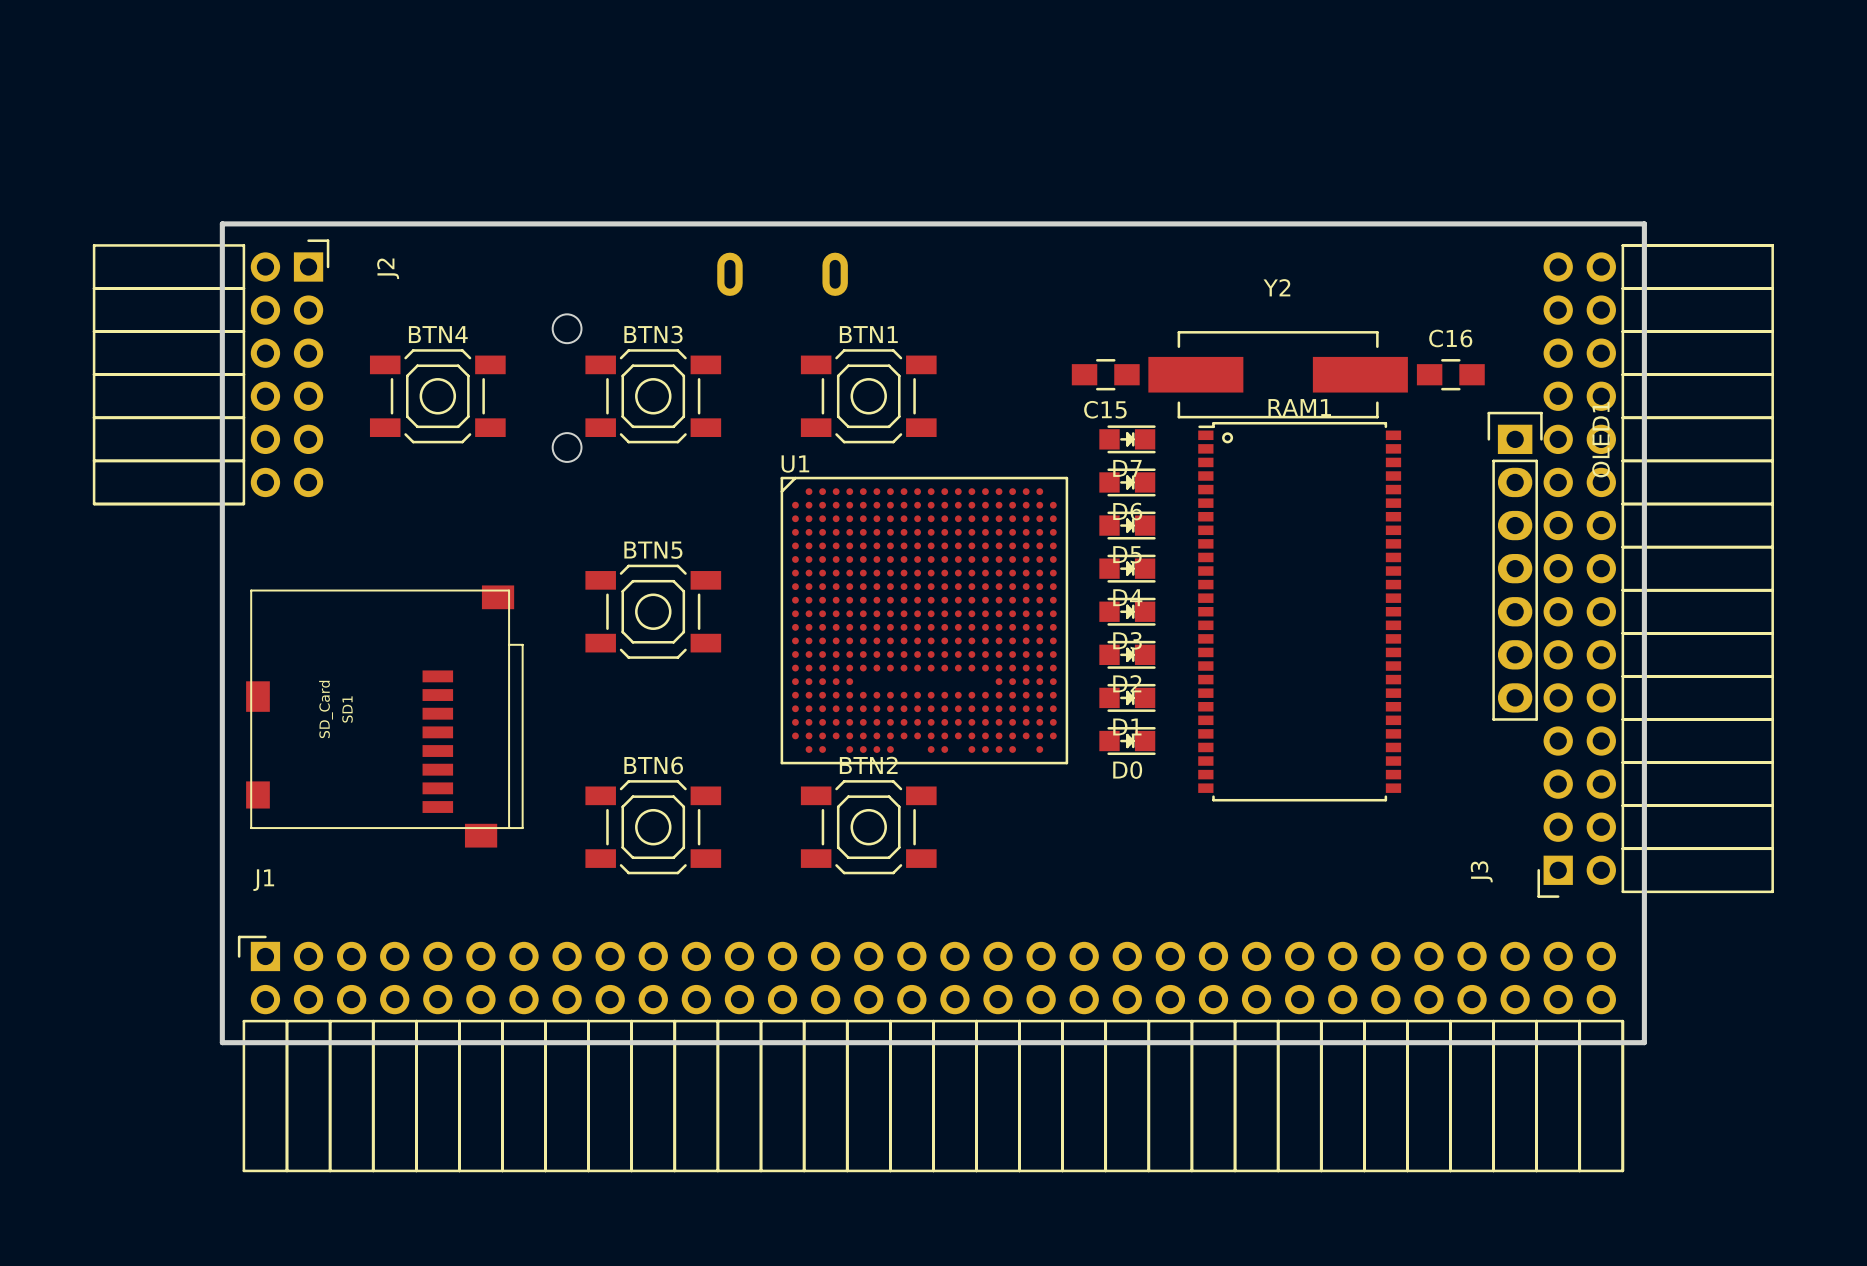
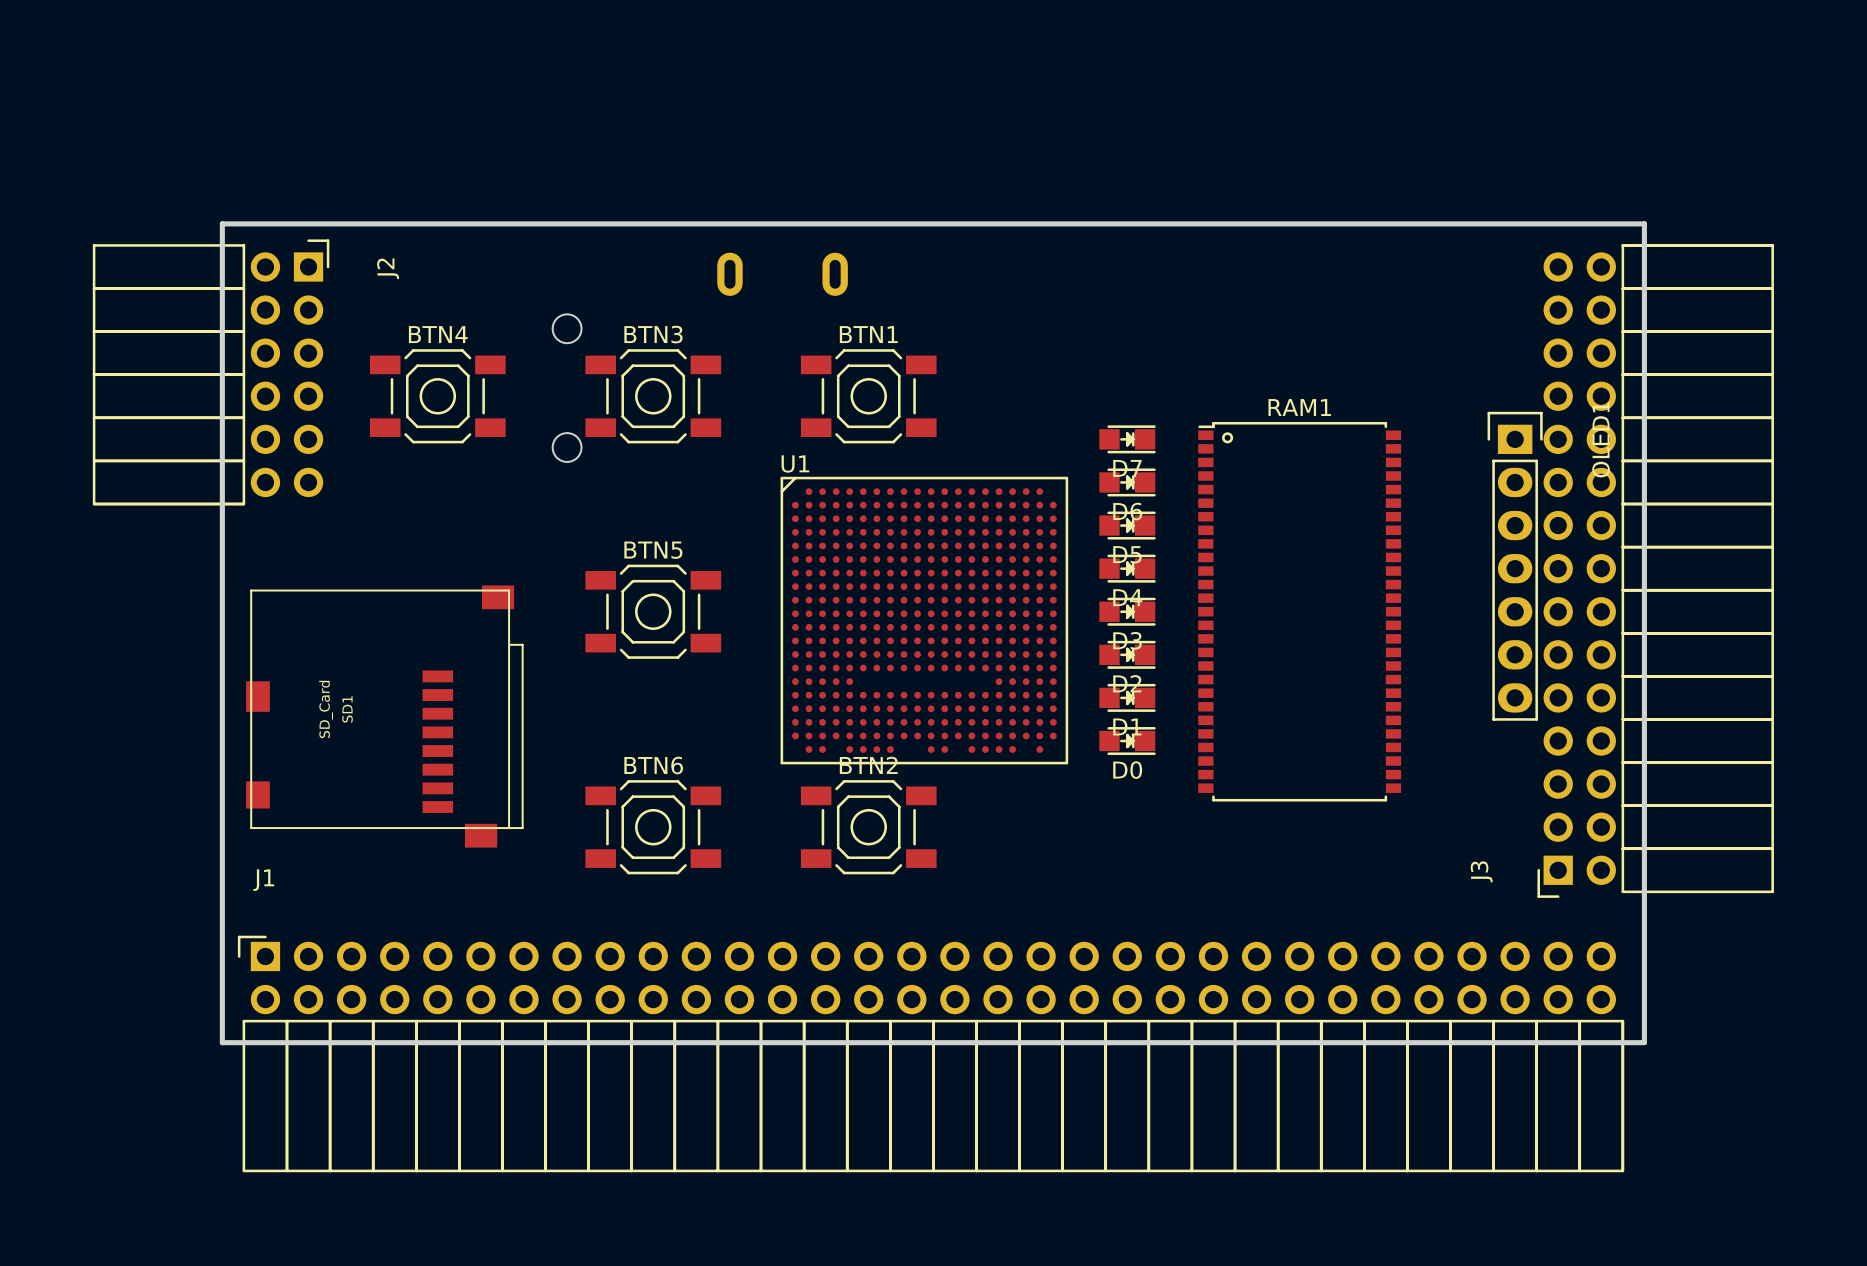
C15: (1105, 374) -> none
Y2: (1278, 374) -> none
C16: (1450, 374) -> none

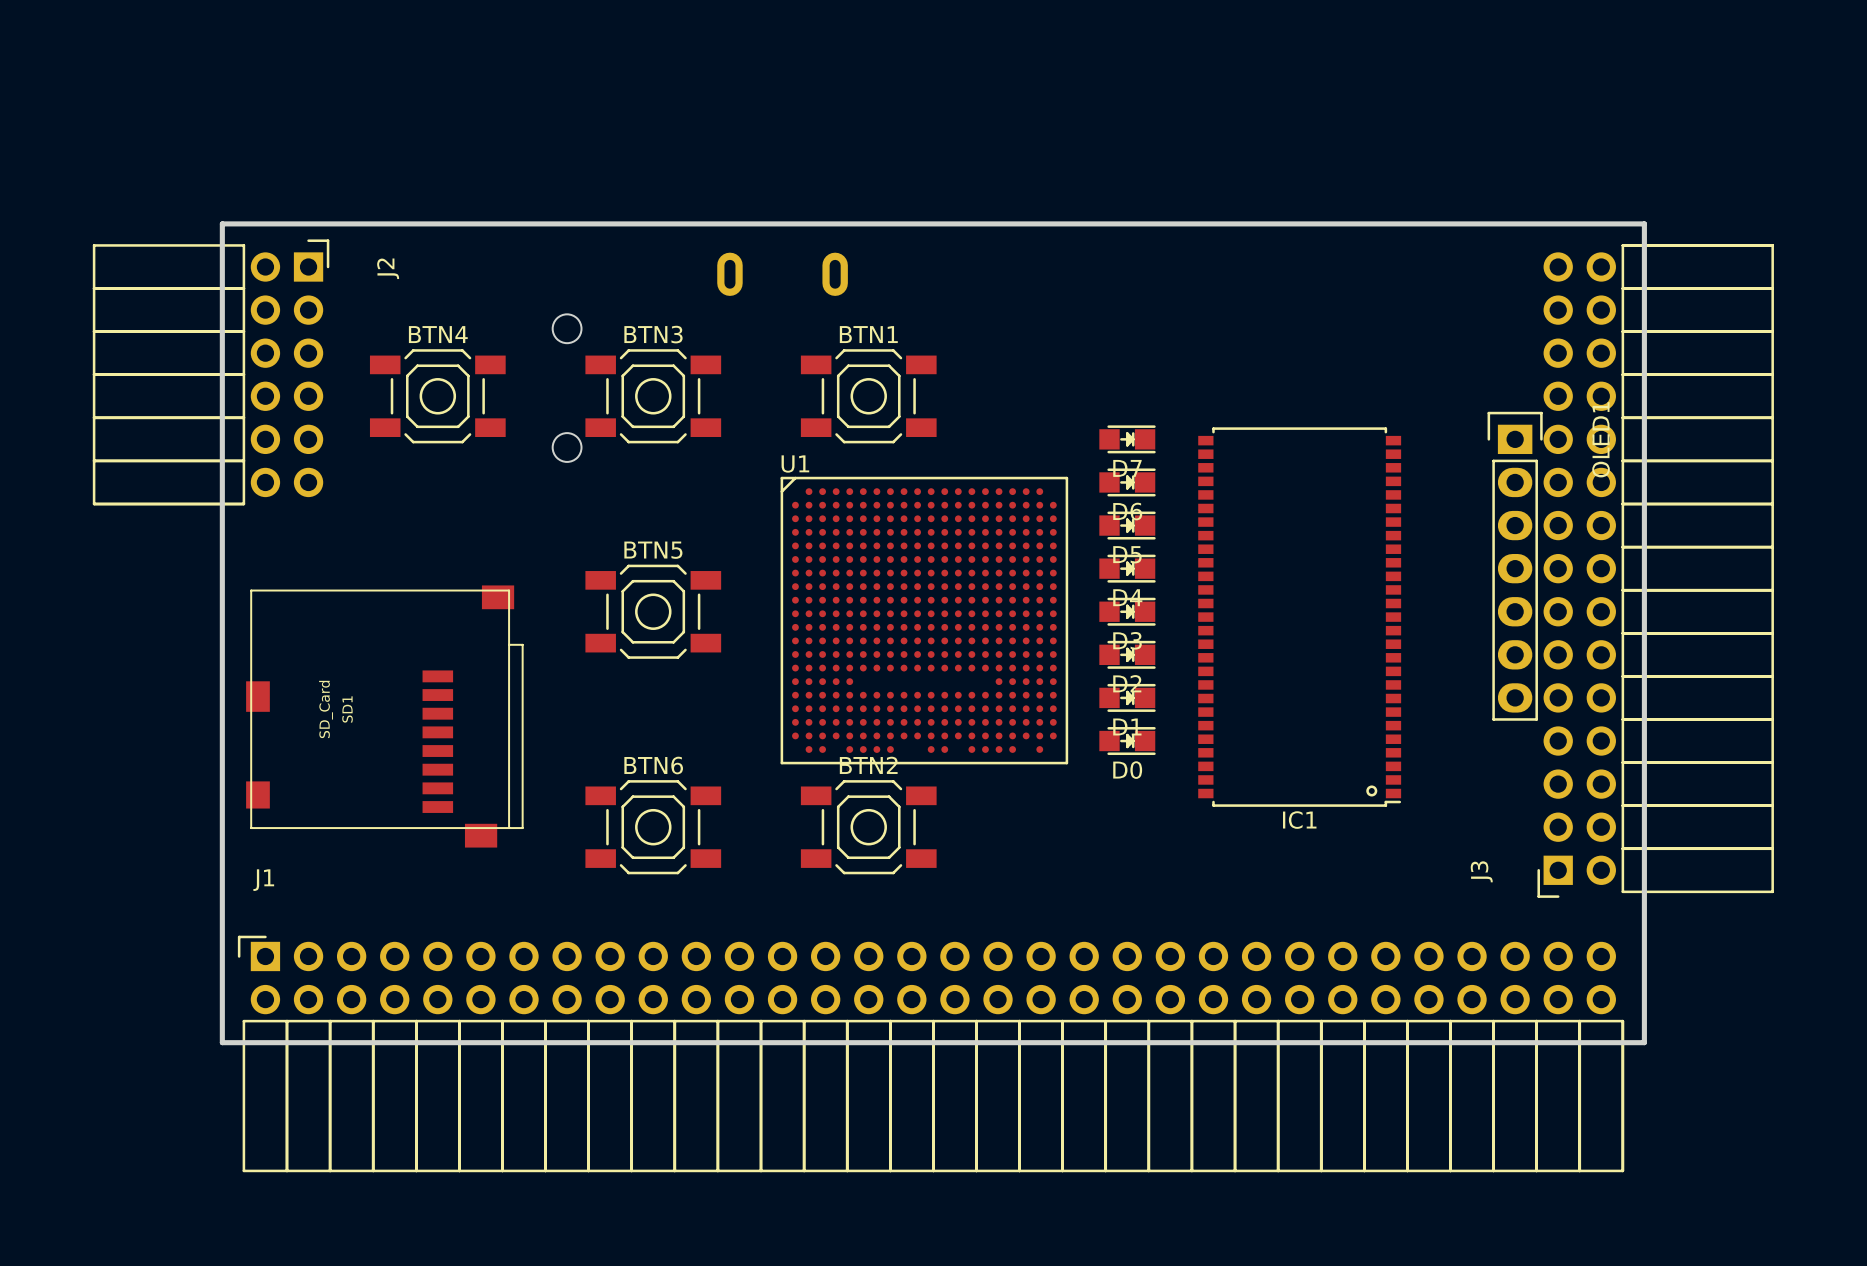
RAM1: (1299, 611) -> none
IC1: none -> (1299, 617)

